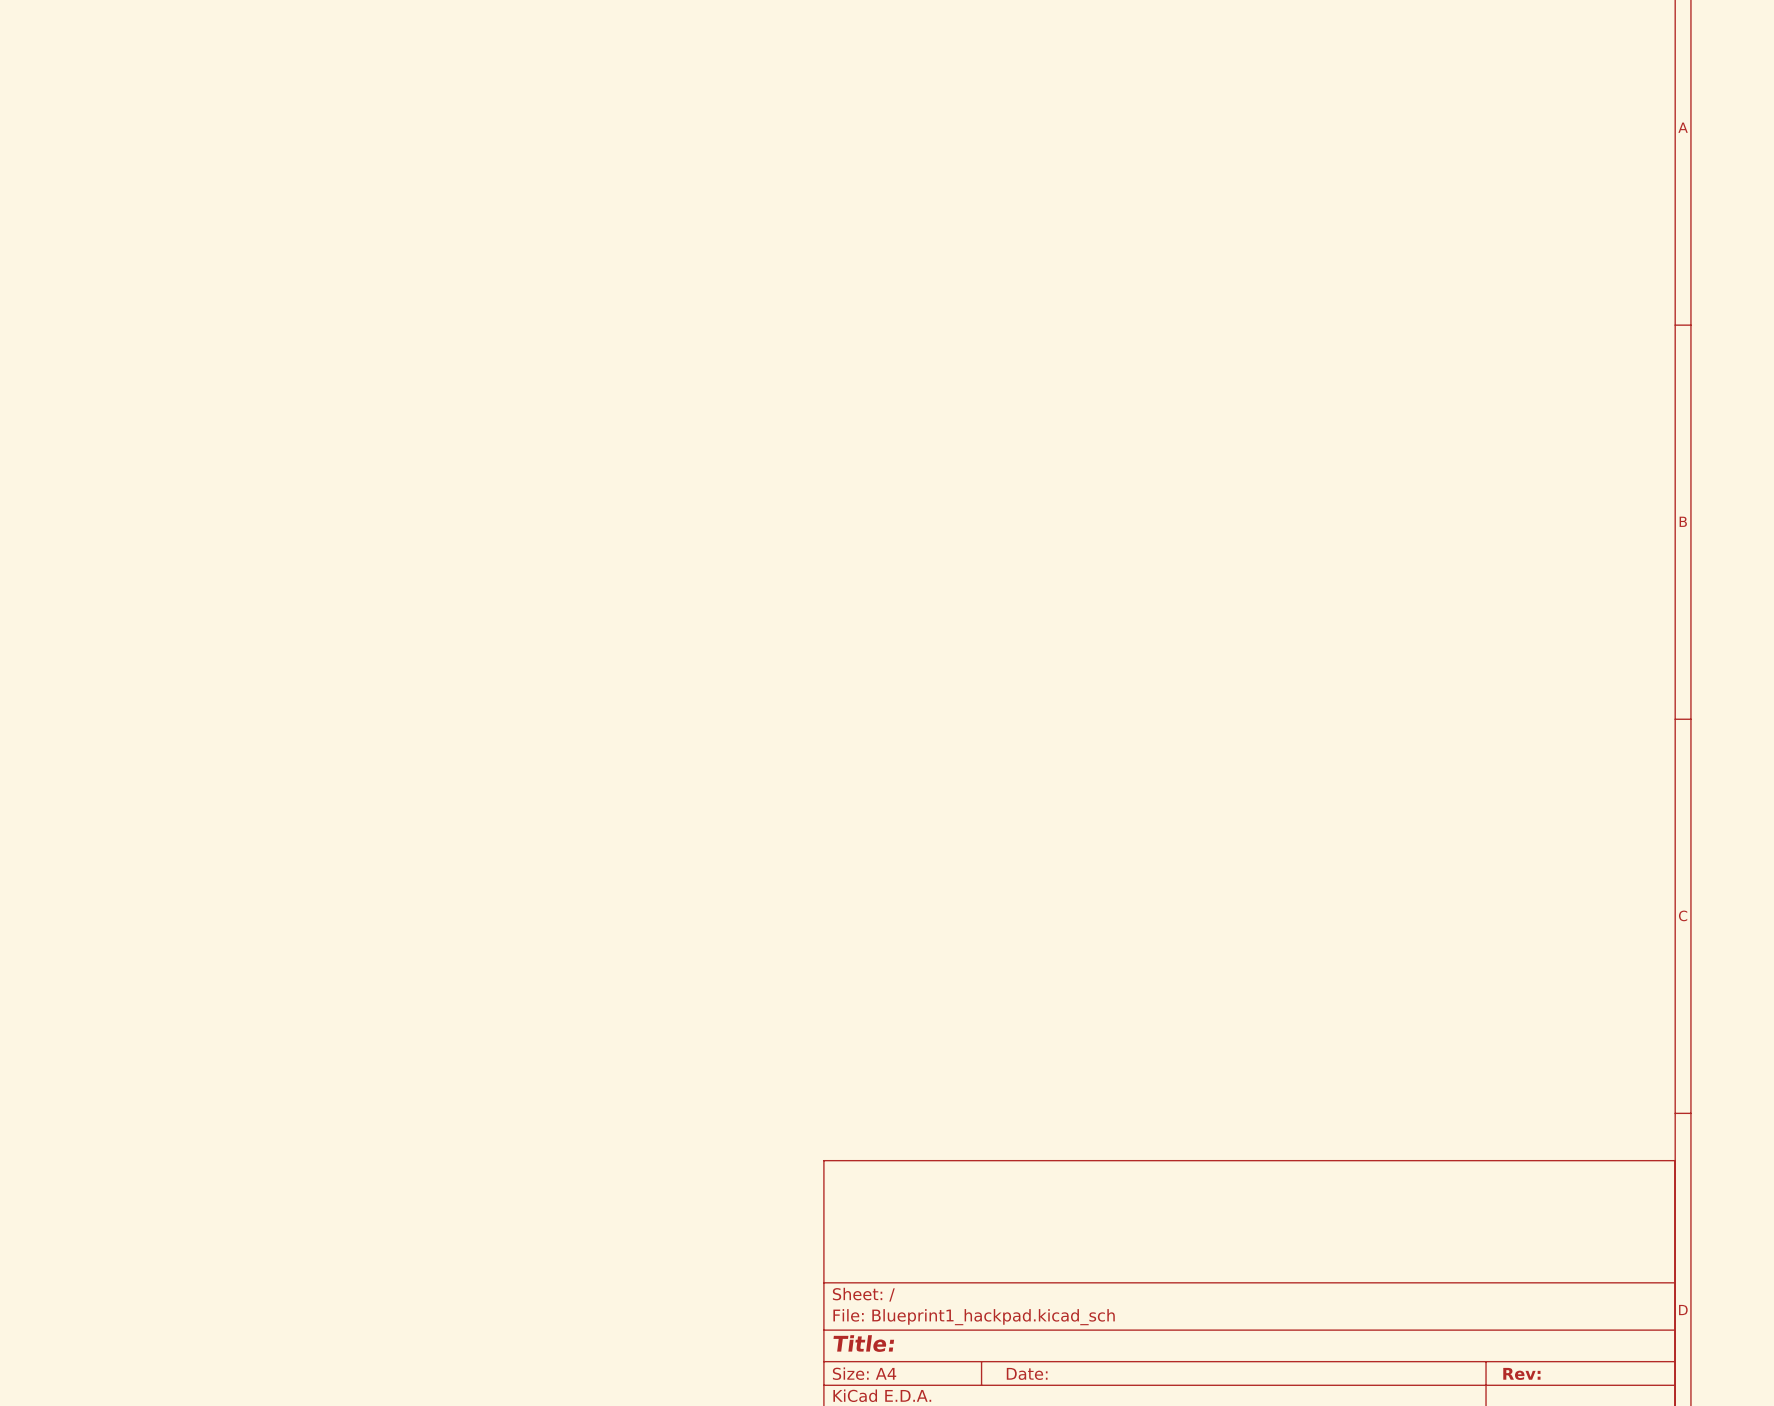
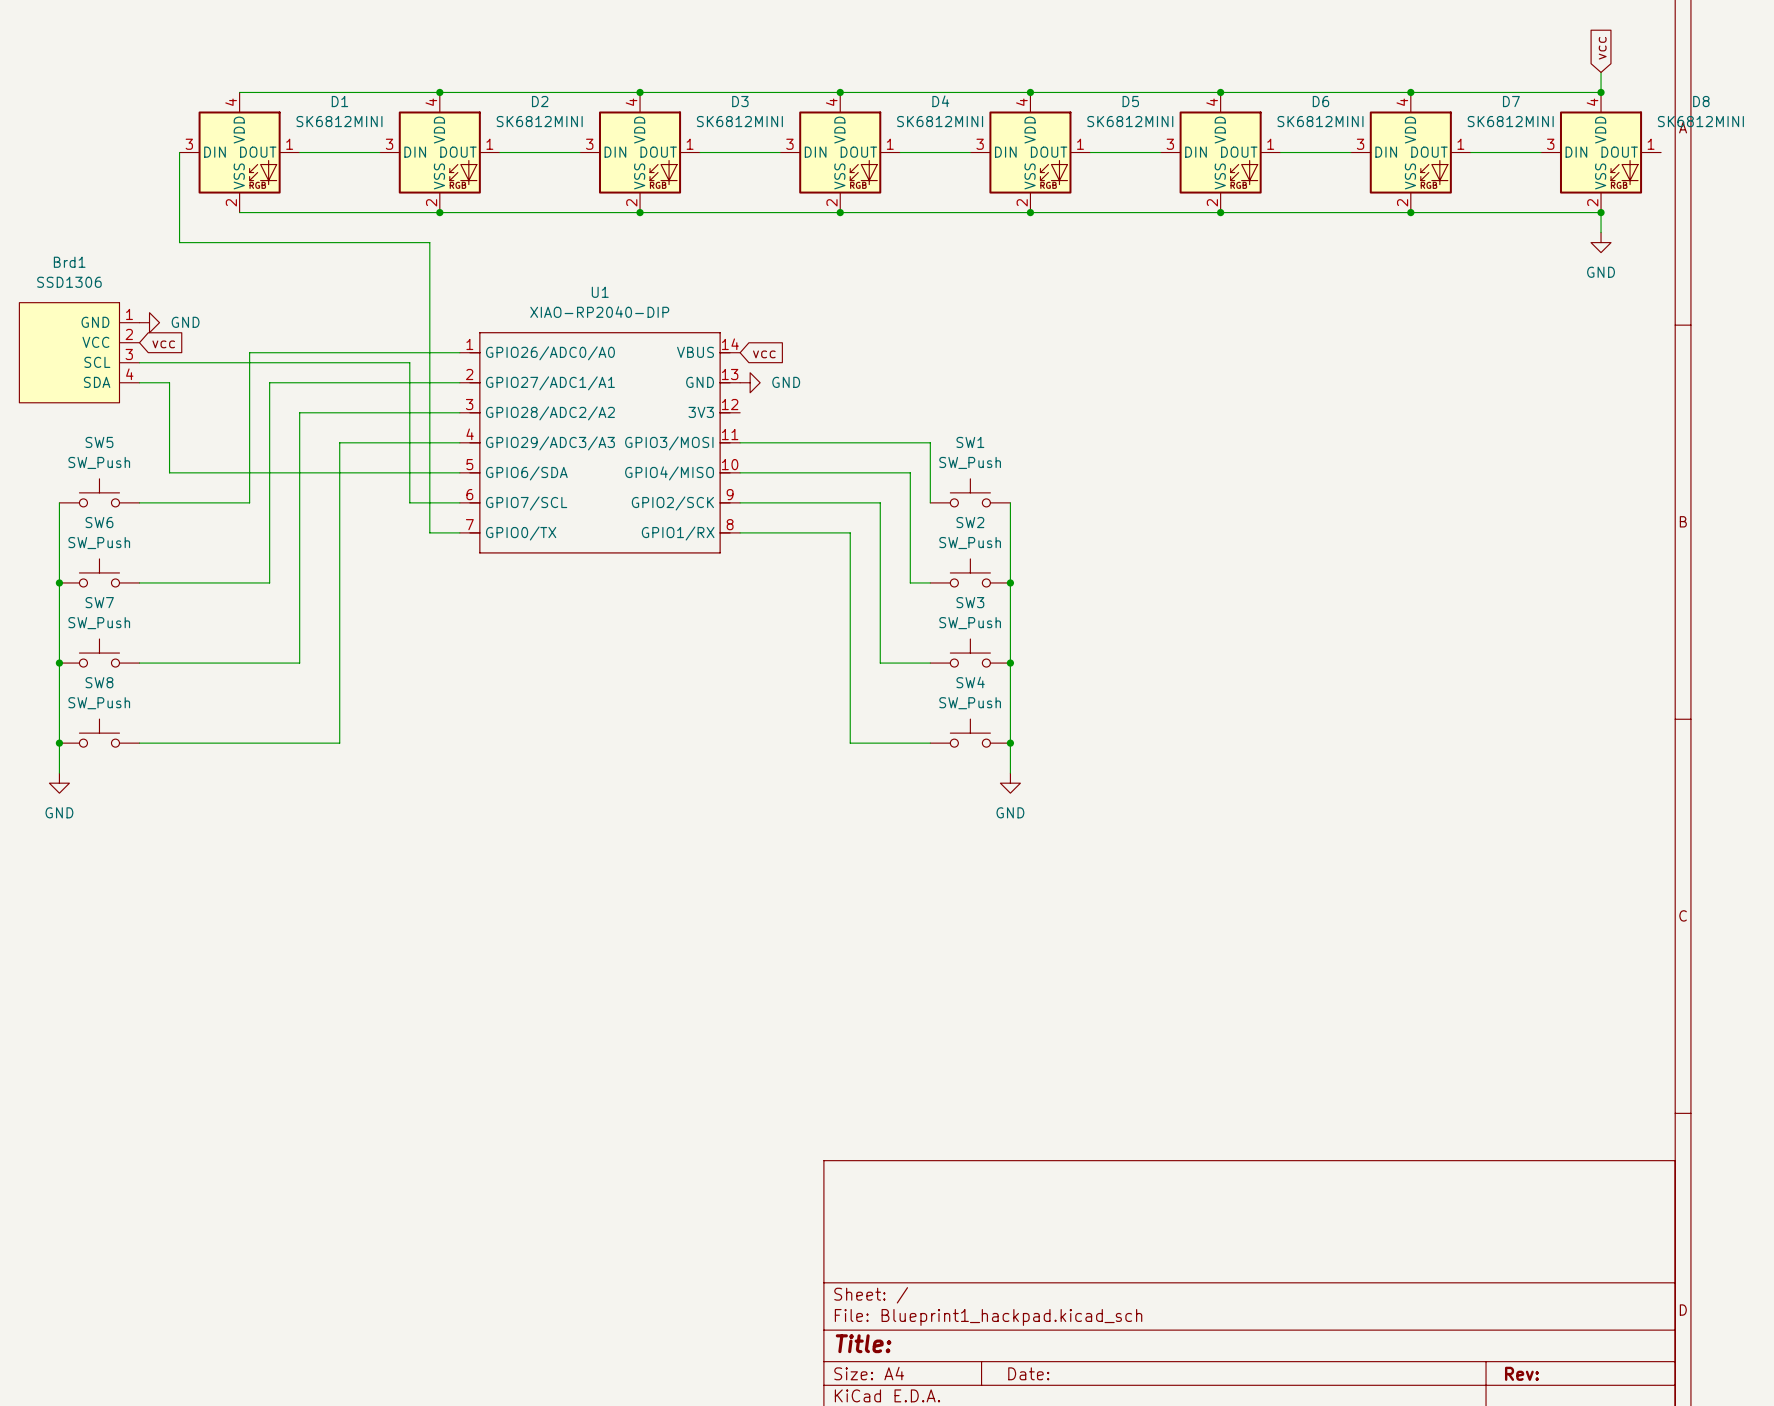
global label: none -> vcc (1602, 48)
wire: none -> (1601, 72) (1601, 92) (239, 92)
junction: none -> (439, 92)
junction: none -> (640, 92)
junction: none -> (840, 92)
junction: none -> (1030, 92)
junction: none -> (1220, 92)
junction: none -> (1410, 92)
junction: none -> (1601, 92)
wire: none -> (179, 152) (179, 242) (429, 242) (429, 532) (459, 532)
D1: none -> SK6812MINI (239, 152)
wire: none -> (299, 152) (379, 152)
D2: none -> SK6812MINI (439, 152)
wire: none -> (499, 152) (579, 152)
D3: none -> SK6812MINI (640, 152)
wire: none -> (700, 152) (780, 152)
D4: none -> SK6812MINI (840, 152)
wire: none -> (900, 152) (970, 152)
D5: none -> SK6812MINI (1030, 152)
wire: none -> (1090, 152) (1160, 152)
D6: none -> SK6812MINI (1220, 152)
wire: none -> (1280, 152) (1350, 152)
D7: none -> SK6812MINI (1410, 152)
wire: none -> (1470, 152) (1540, 152)
D8: none -> SK6812MINI (1601, 152)
wire: none -> (239, 212) (1601, 212) (1601, 232)
junction: none -> (439, 212)
junction: none -> (640, 212)
junction: none -> (840, 212)
junction: none -> (1030, 212)
junction: none -> (1220, 212)
junction: none -> (1410, 212)
junction: none -> (1601, 212)
power symbol: none -> GND (1601, 242)
power symbol: none -> GND (149, 322)
global label: none -> vcc (163, 344)
Brd1: none -> SSD1306 (79, 352)
wire: none -> (459, 352) (249, 352) (249, 502) (139, 502)
global label: none -> vcc (764, 354)
wire: none -> (139, 362) (409, 362) (409, 502) (459, 502)
wire: none -> (139, 382) (169, 382) (169, 472) (459, 472)
wire: none -> (459, 382) (269, 382) (269, 582) (139, 582)
power symbol: none -> GND (750, 382)
wire: none -> (459, 412) (299, 412) (299, 663) (139, 663)
wire: none -> (459, 442) (339, 442) (339, 743) (139, 743)
U1: none -> XIAO-RP2040-DIP (599, 442)
wire: none -> (740, 442) (930, 442) (930, 502)
wire: none -> (740, 472) (910, 472) (910, 582) (930, 582)
SW5: none -> SW_Push (99, 492)
SW1: none -> SW_Push (970, 492)
wire: none -> (59, 502) (59, 773)
wire: none -> (740, 502) (880, 502) (880, 663) (930, 663)
wire: none -> (1010, 502) (1010, 773)
wire: none -> (740, 532) (850, 532) (850, 743) (930, 743)
SW6: none -> SW_Push (99, 572)
SW2: none -> SW_Push (970, 572)
junction: none -> (59, 582)
junction: none -> (1010, 582)
SW7: none -> SW_Push (99, 653)
SW3: none -> SW_Push (970, 653)
junction: none -> (59, 663)
junction: none -> (1010, 663)
SW8: none -> SW_Push (99, 733)
SW4: none -> SW_Push (970, 733)
junction: none -> (59, 743)
junction: none -> (1010, 743)
power symbol: none -> GND (59, 783)
power symbol: none -> GND (1010, 783)

